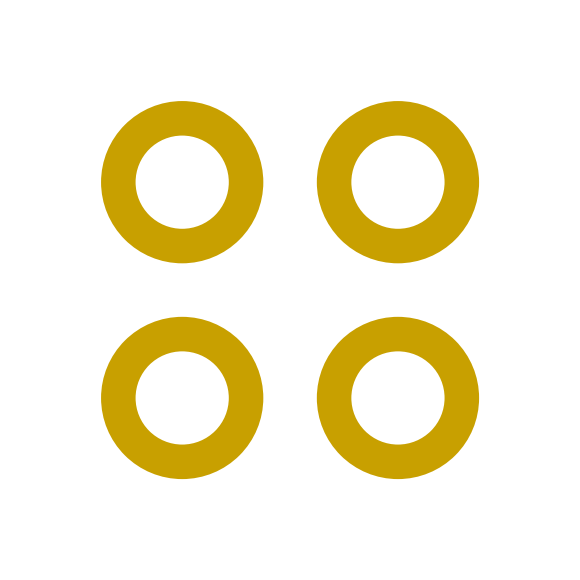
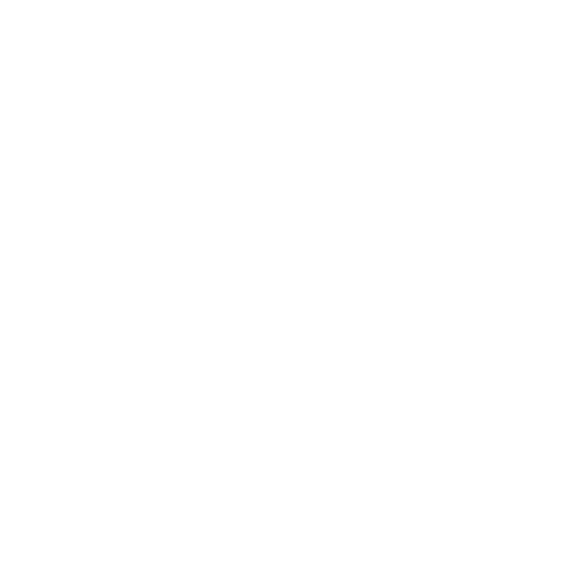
part: (182, 182) -> none
part: (397, 182) -> none
part: (182, 397) -> none
part: (397, 397) -> none

